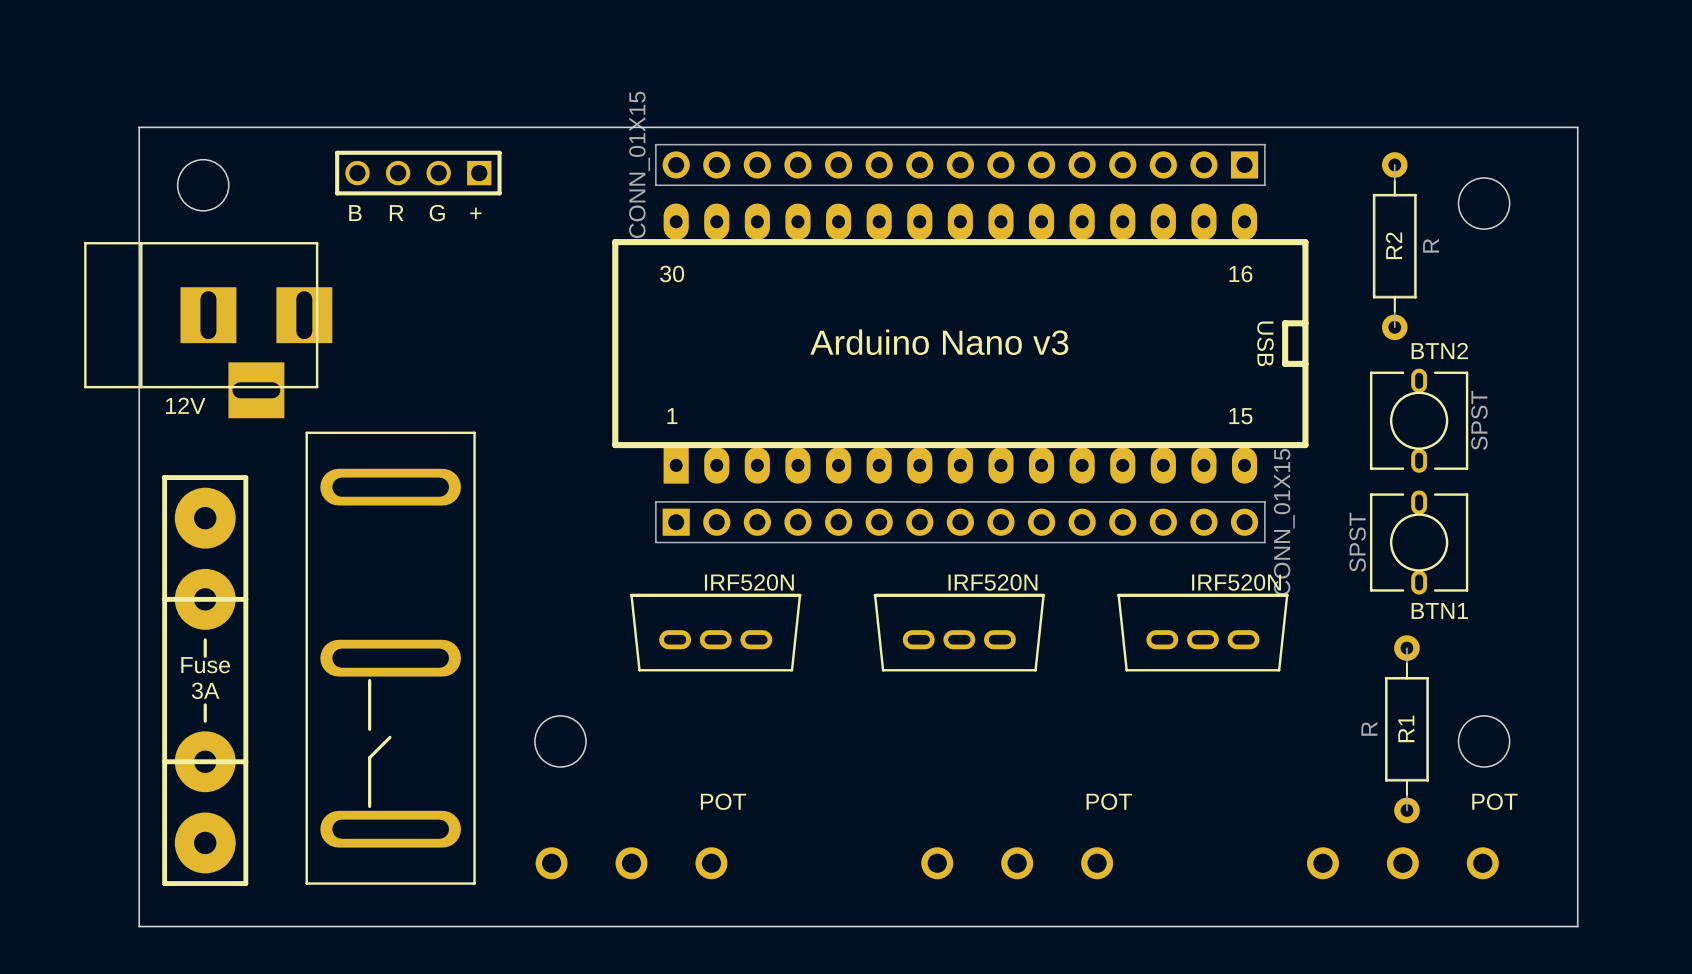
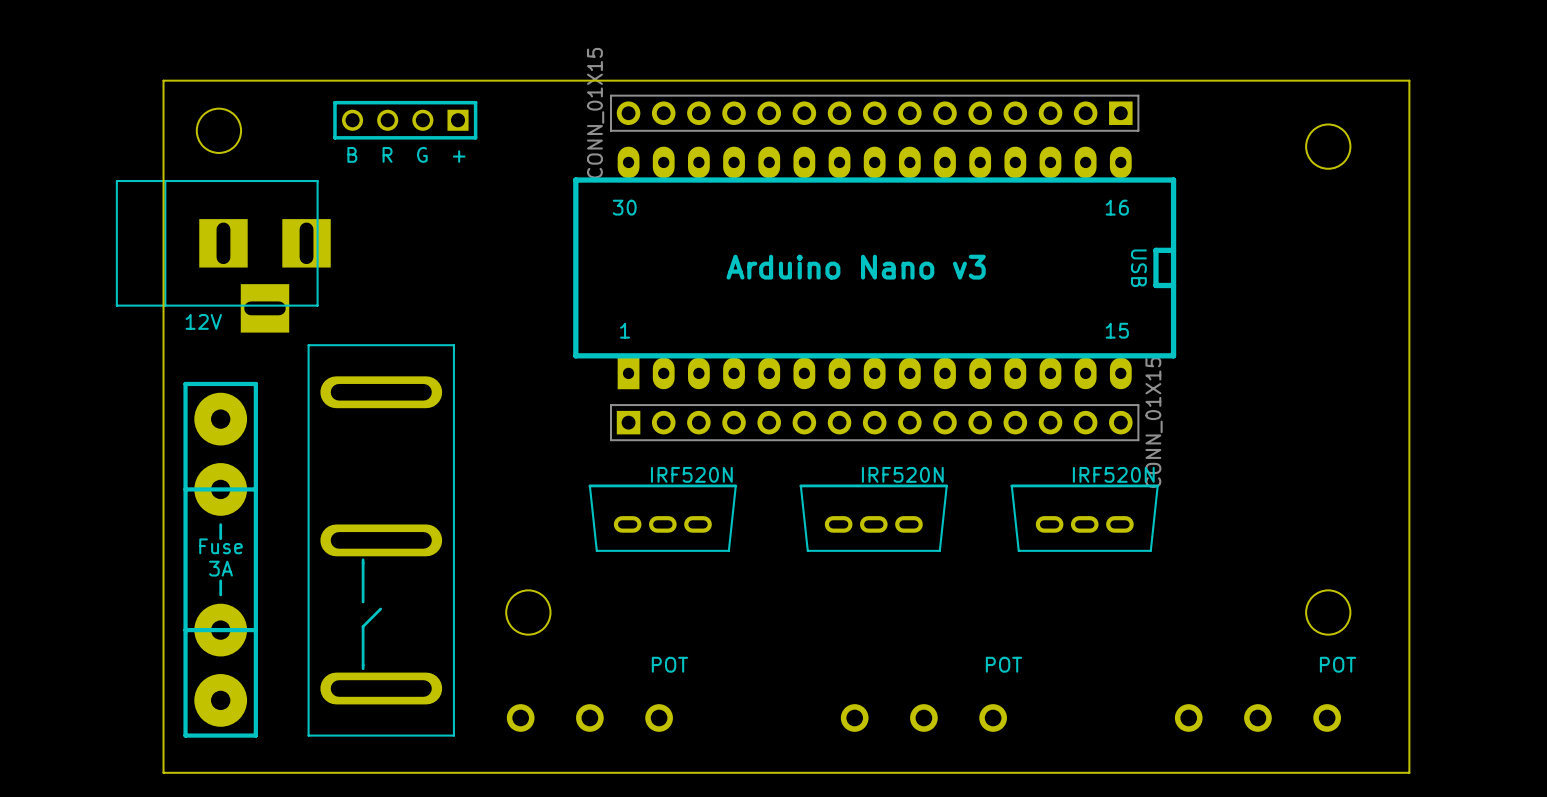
R2: R (1394, 246) -> none
BTN2: SPST (1419, 420) -> none
BTN1: SPST (1419, 542) -> none
R1: R (1406, 729) -> none

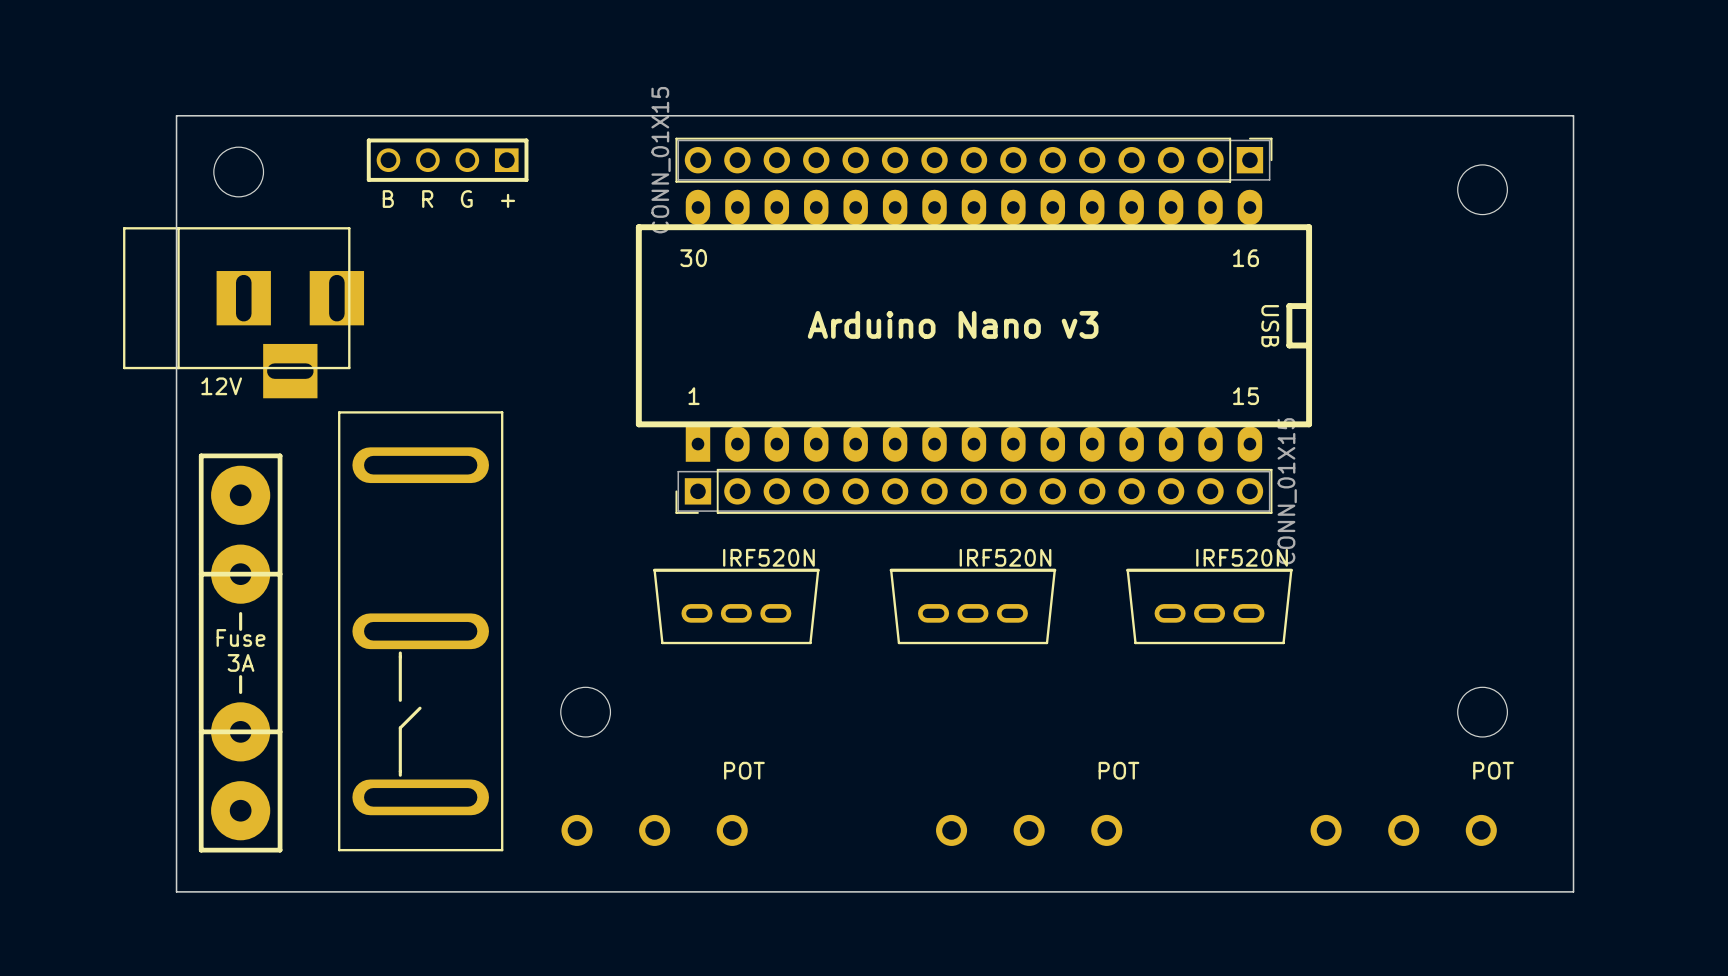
part footprint: [610, 94, 1140, 132] -> [675, 137, 1273, 183]
part footprint: [610, 404, 1140, 441] -> [675, 468, 1273, 514]

